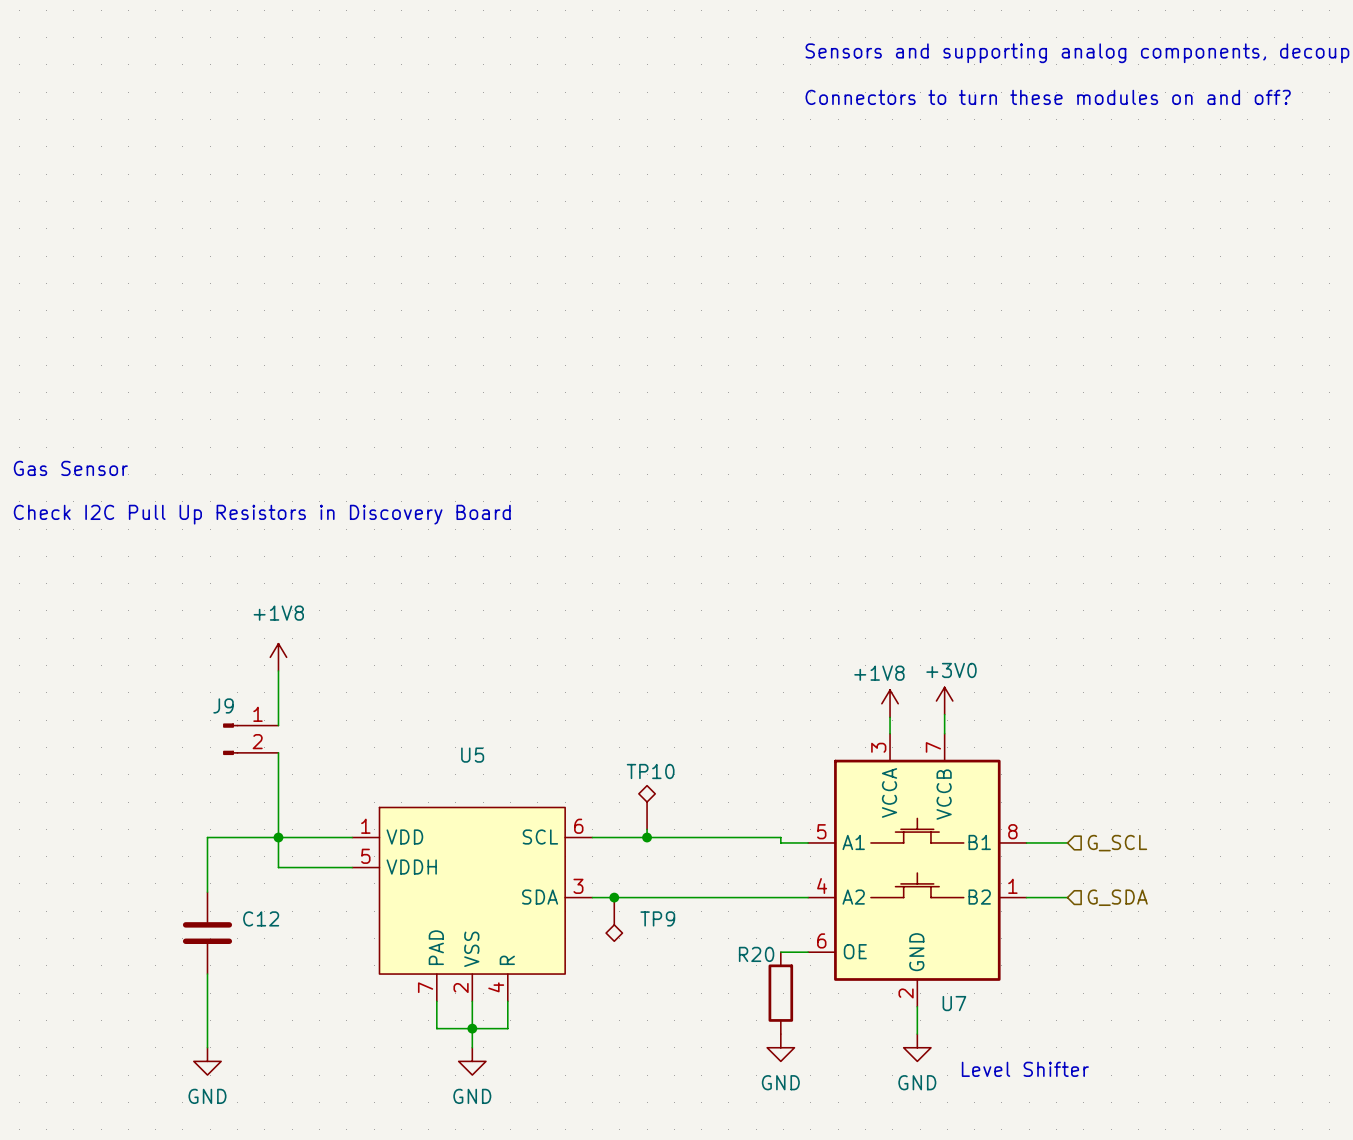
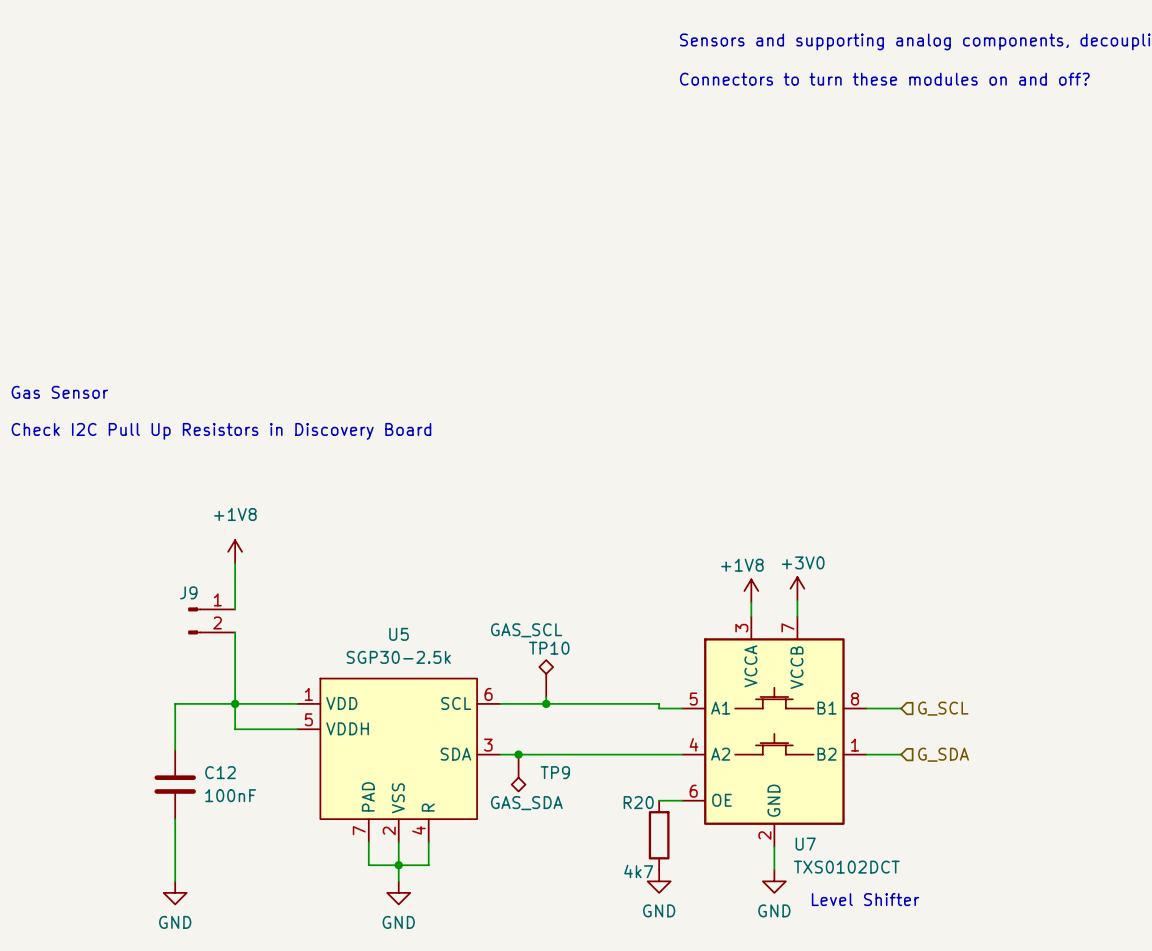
TP10 value: none -> GAS_SCL (526, 630)
U5 value: none -> SGP30-2.5k (398, 657)
C12 value: none -> 100nF (230, 795)
TP9 value: none -> GAS_SDA (526, 803)
U7 value: none -> TXS0102DCT (846, 867)
R20 value: none -> 4k7 (638, 871)

